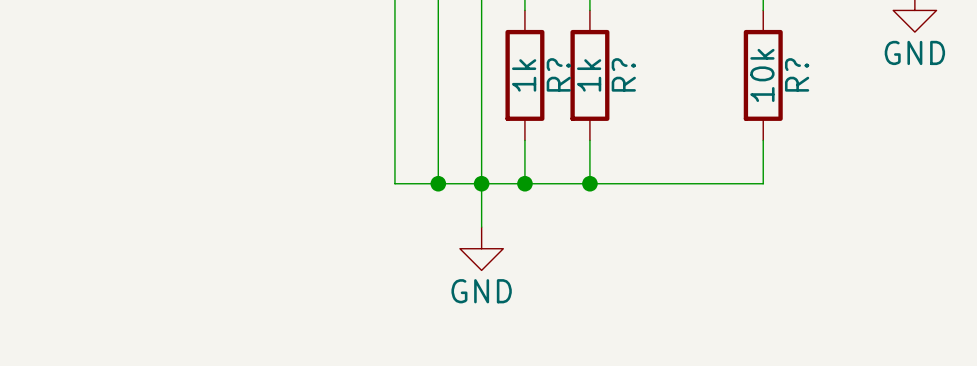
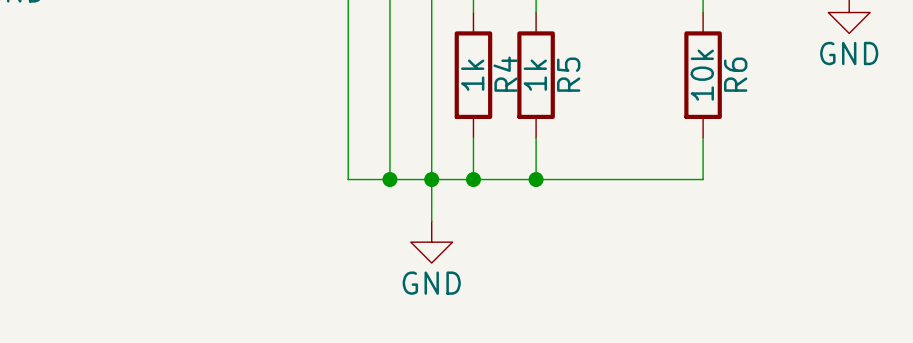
R? name: R? (558, 74) -> R4 (505, 74)
R? name: R? (623, 74) -> R5 (568, 74)
R? name: R? (797, 74) -> R6 (735, 74)

